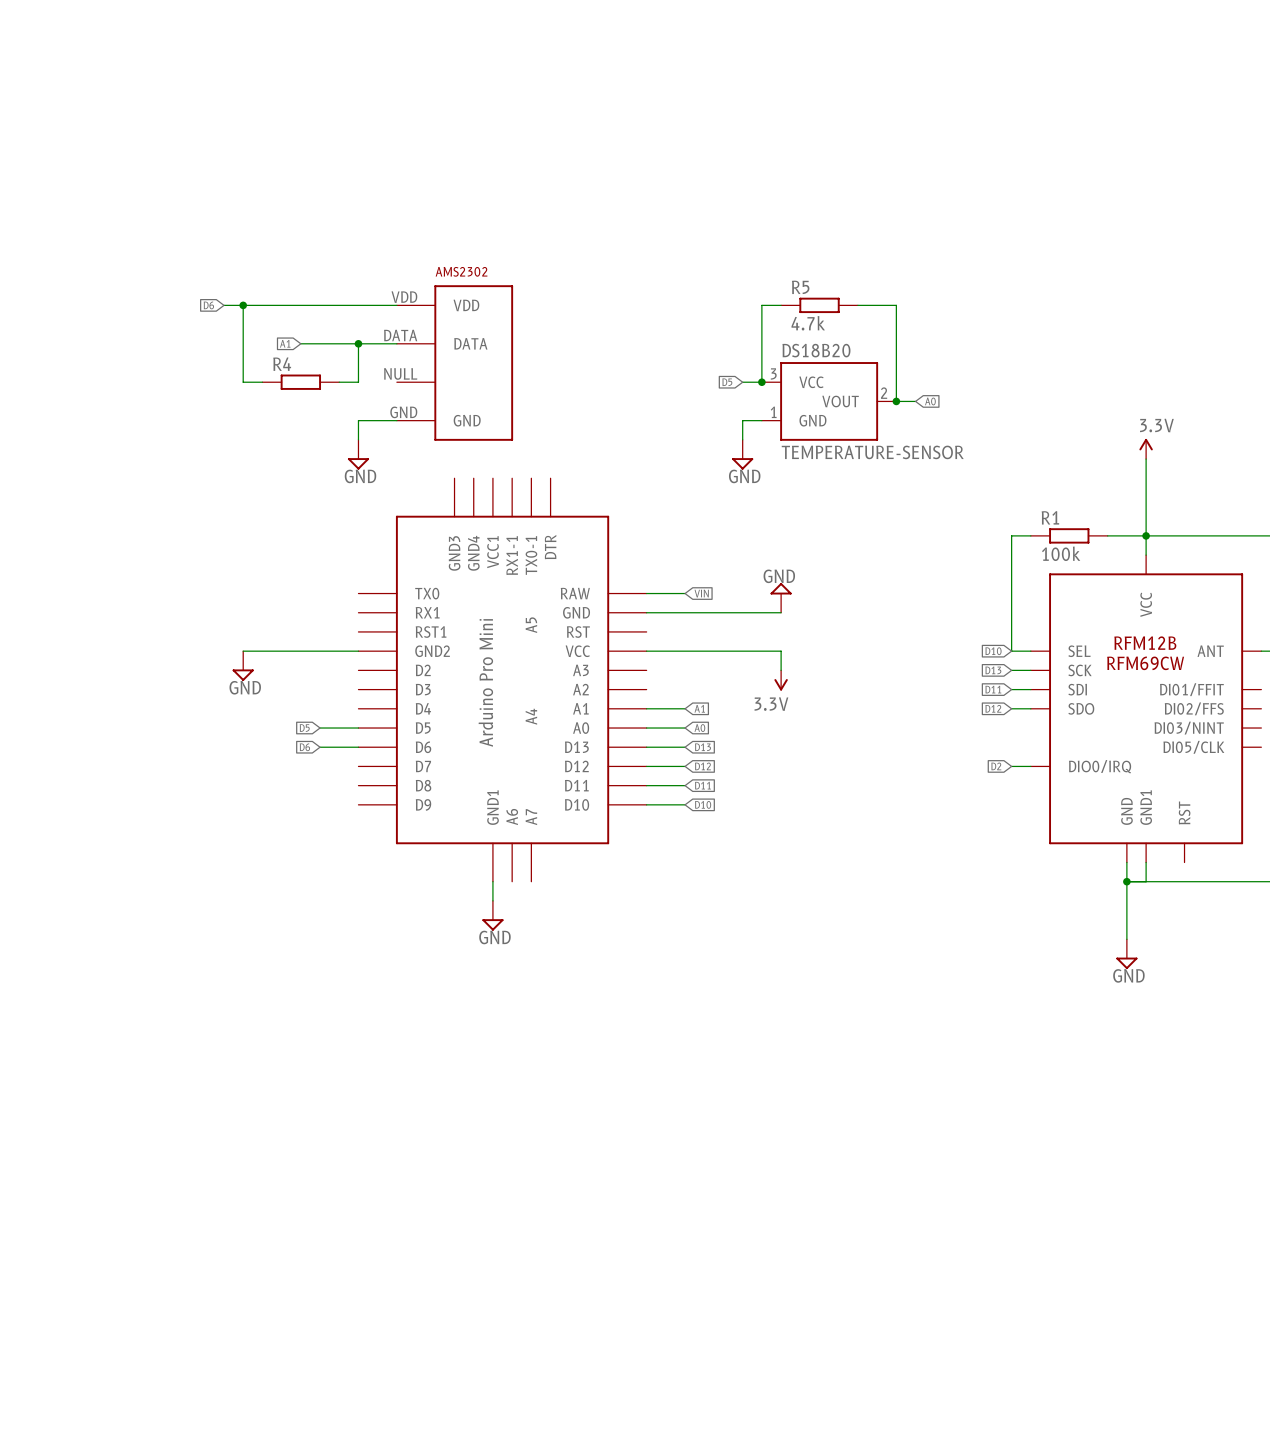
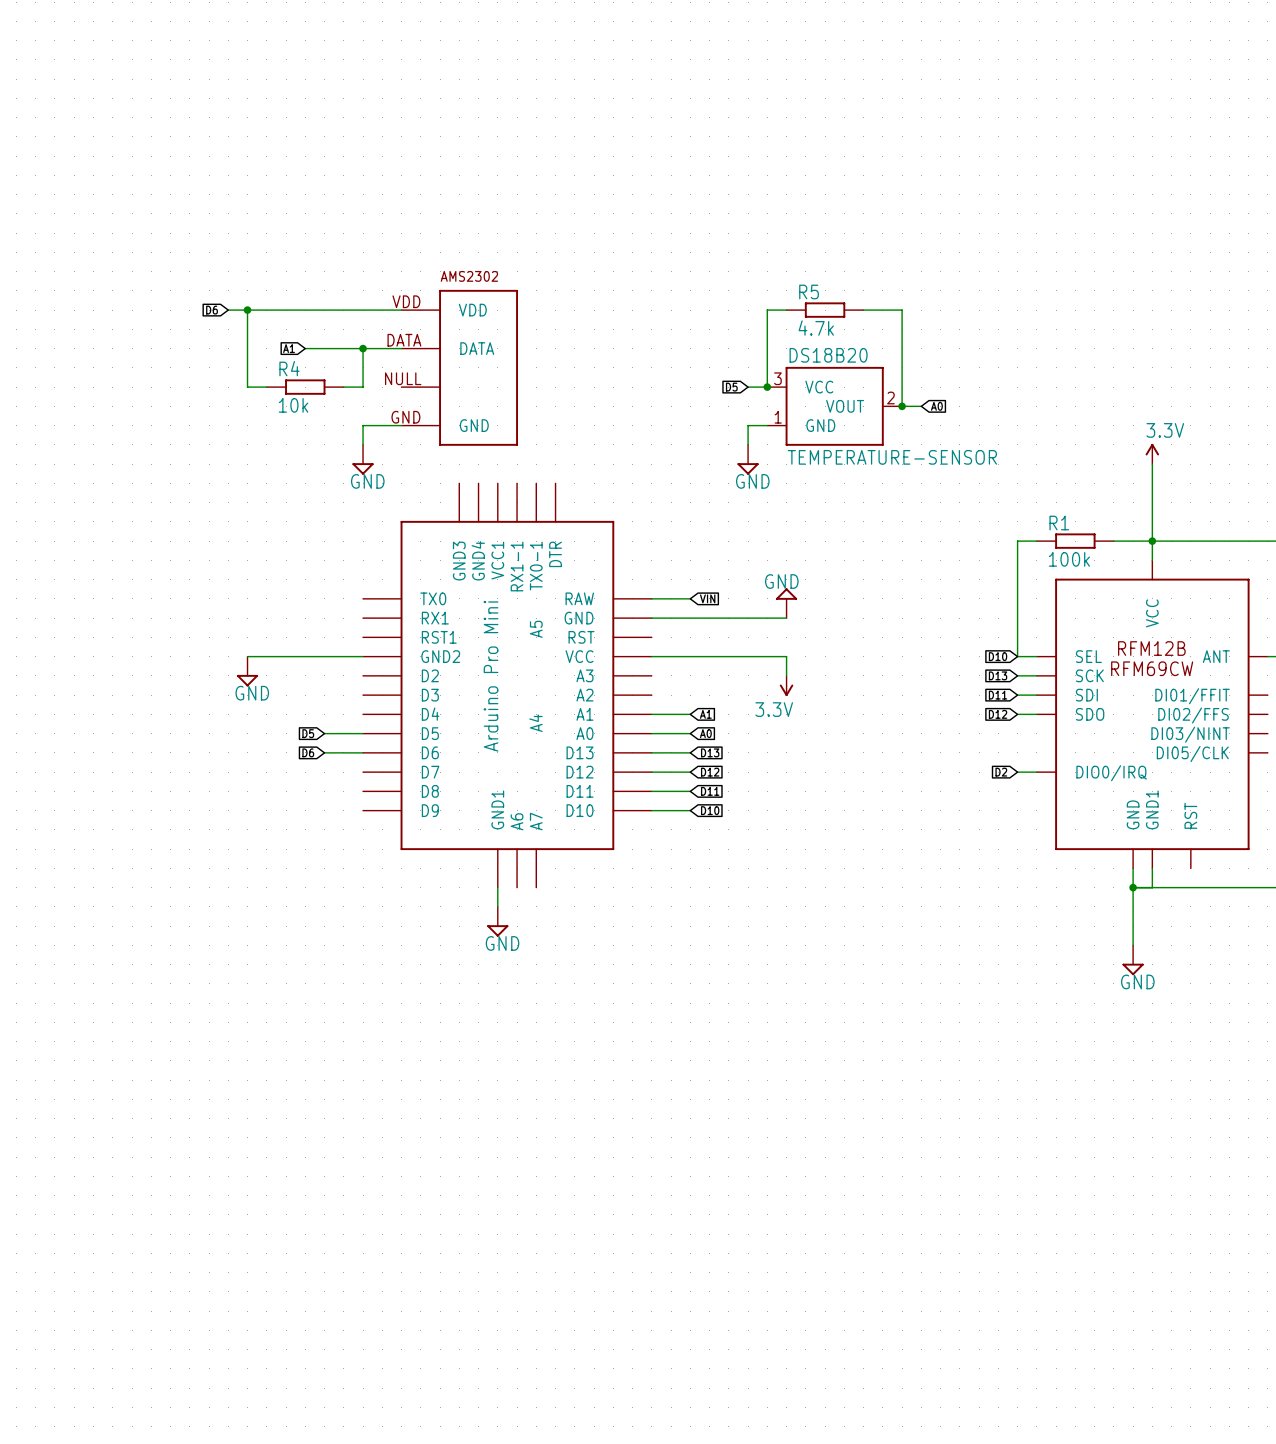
R4 value: none -> 10k (293, 405)

